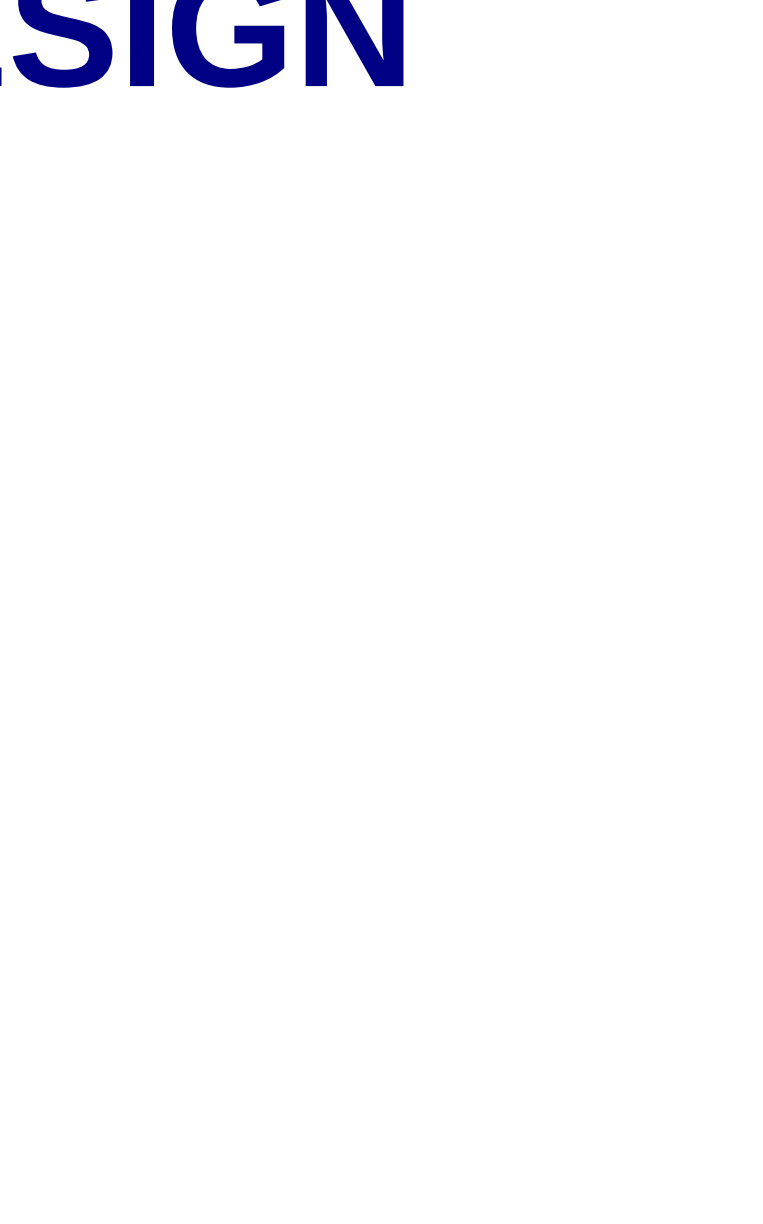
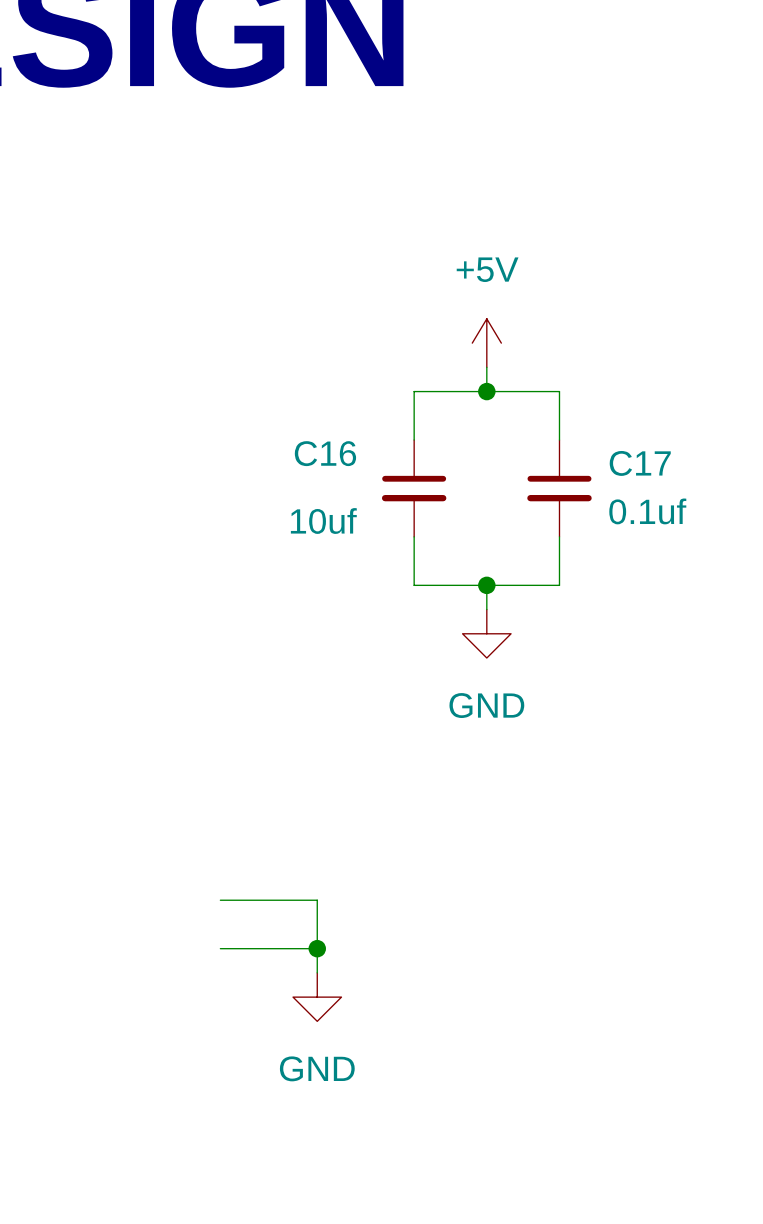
power symbol: none -> +5V (486, 343)
wire: none -> (486, 367) (486, 391)
junction: none -> (486, 391)
wire: none -> (414, 440) (414, 391) (559, 391) (559, 440)
C16: none -> 10uf (414, 488)
C17: none -> 0.1uf (559, 488)
wire: none -> (414, 536) (414, 585) (559, 585) (559, 536)
wire: none -> (486, 585) (486, 609)
junction: none -> (486, 585)
power symbol: none -> GND (486, 633)
wire: none -> (220, 900) (317, 900) (317, 972)
wire: none -> (220, 948) (317, 948)
junction: none -> (317, 948)
power symbol: none -> GND (317, 997)

